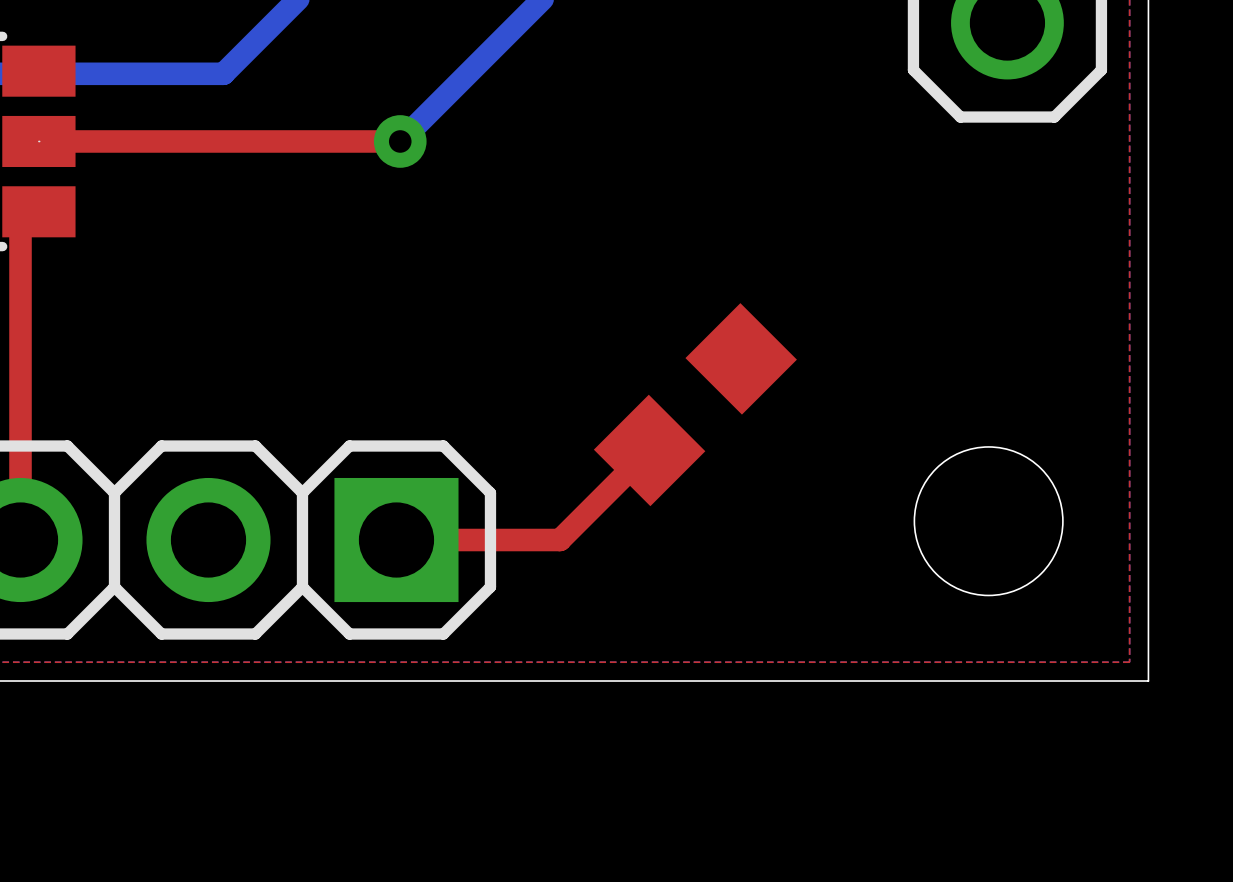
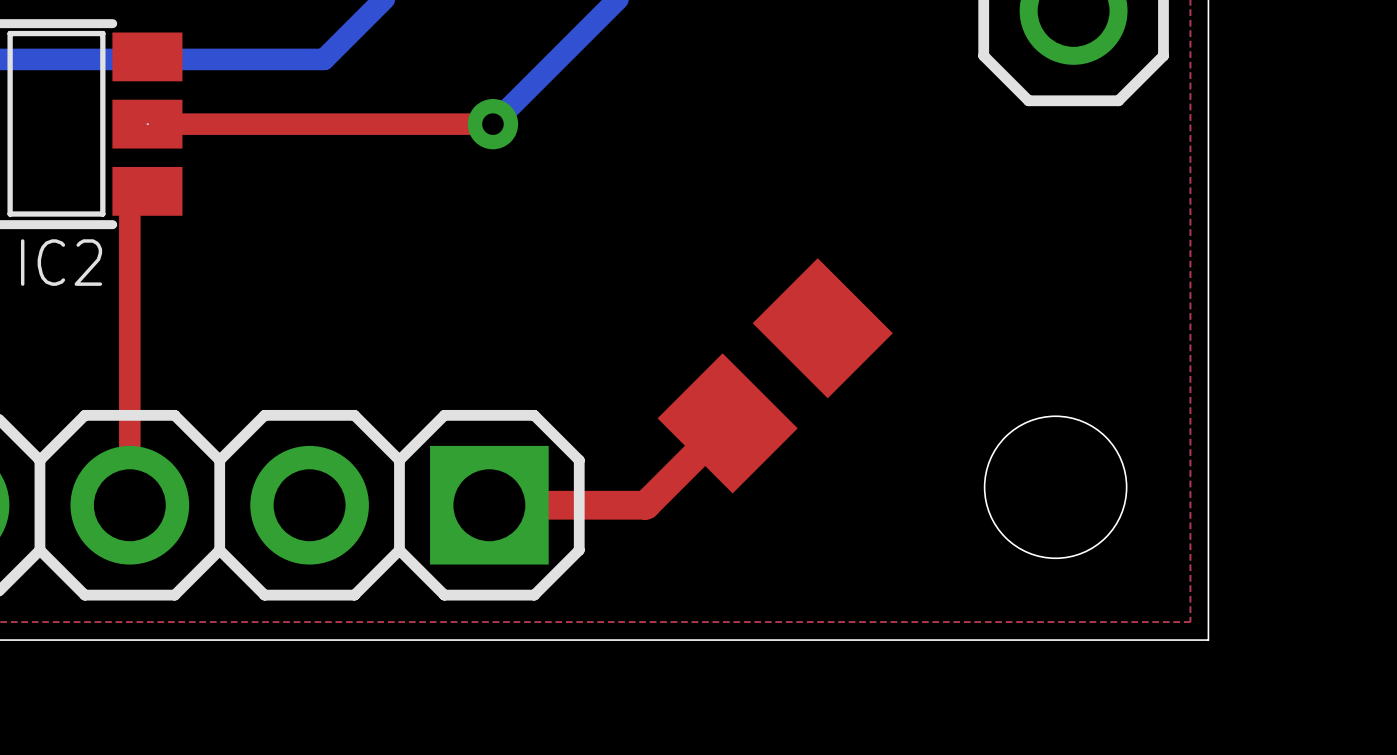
part footprint: [593, 303, 797, 507] -> [657, 258, 893, 494]
top track width: thin (645, 454) (560, 540) (396, 540) -> thick (727, 423) (645, 505) (489, 505)

